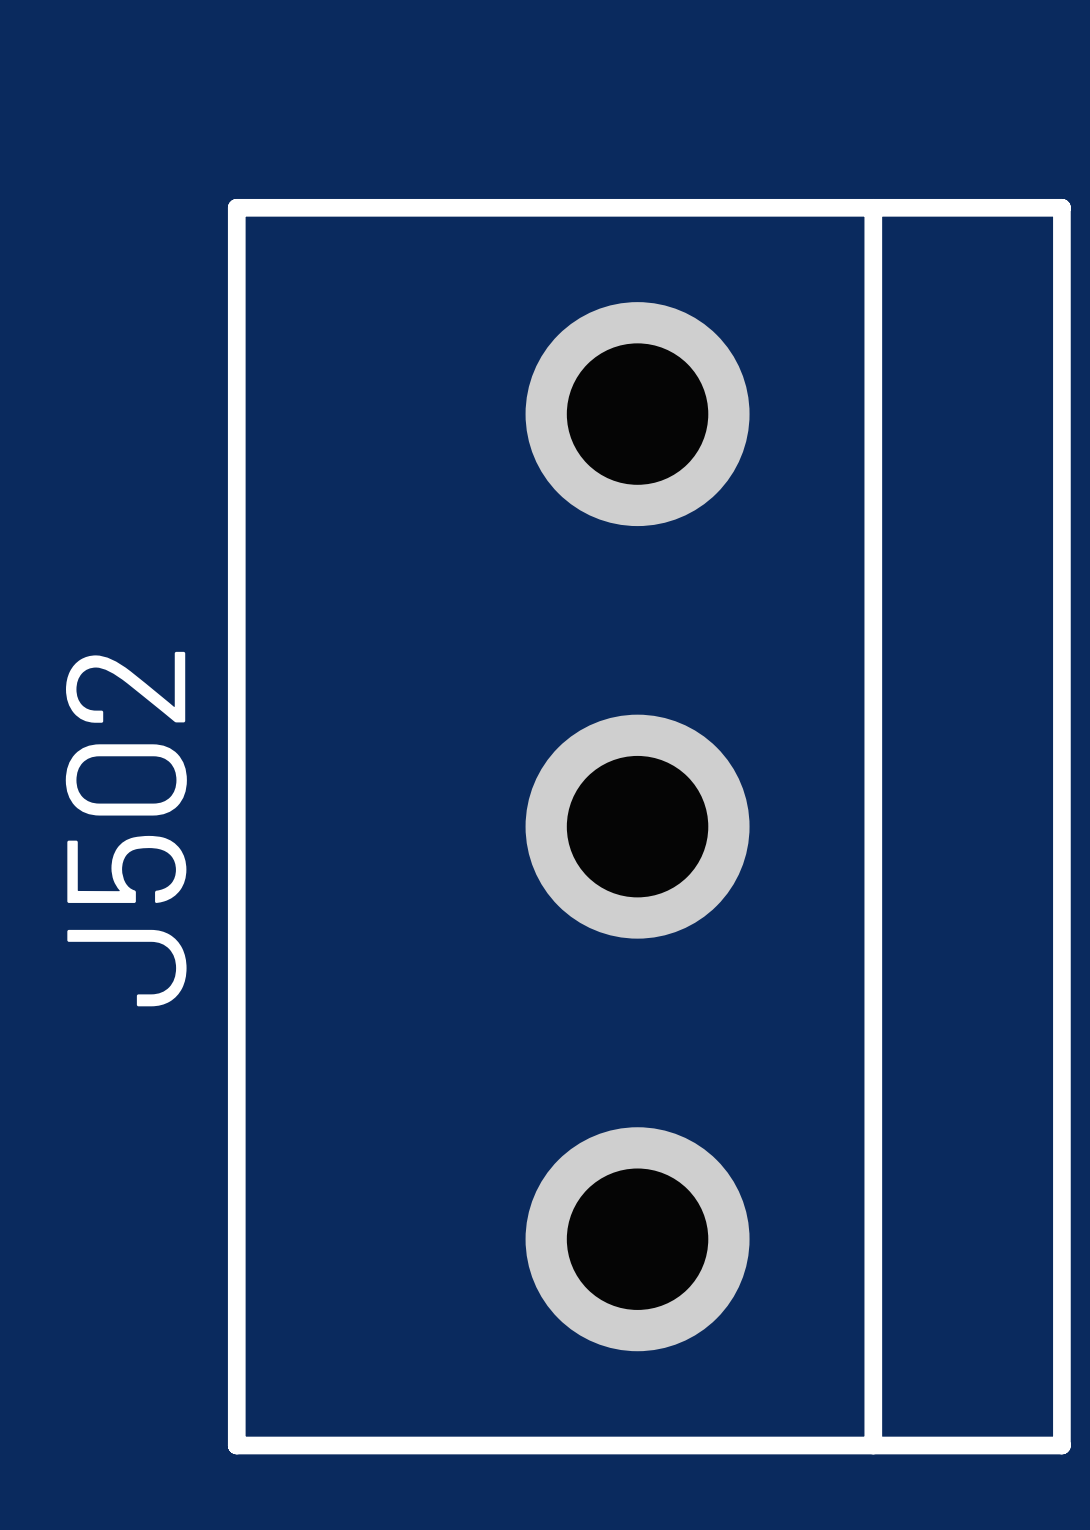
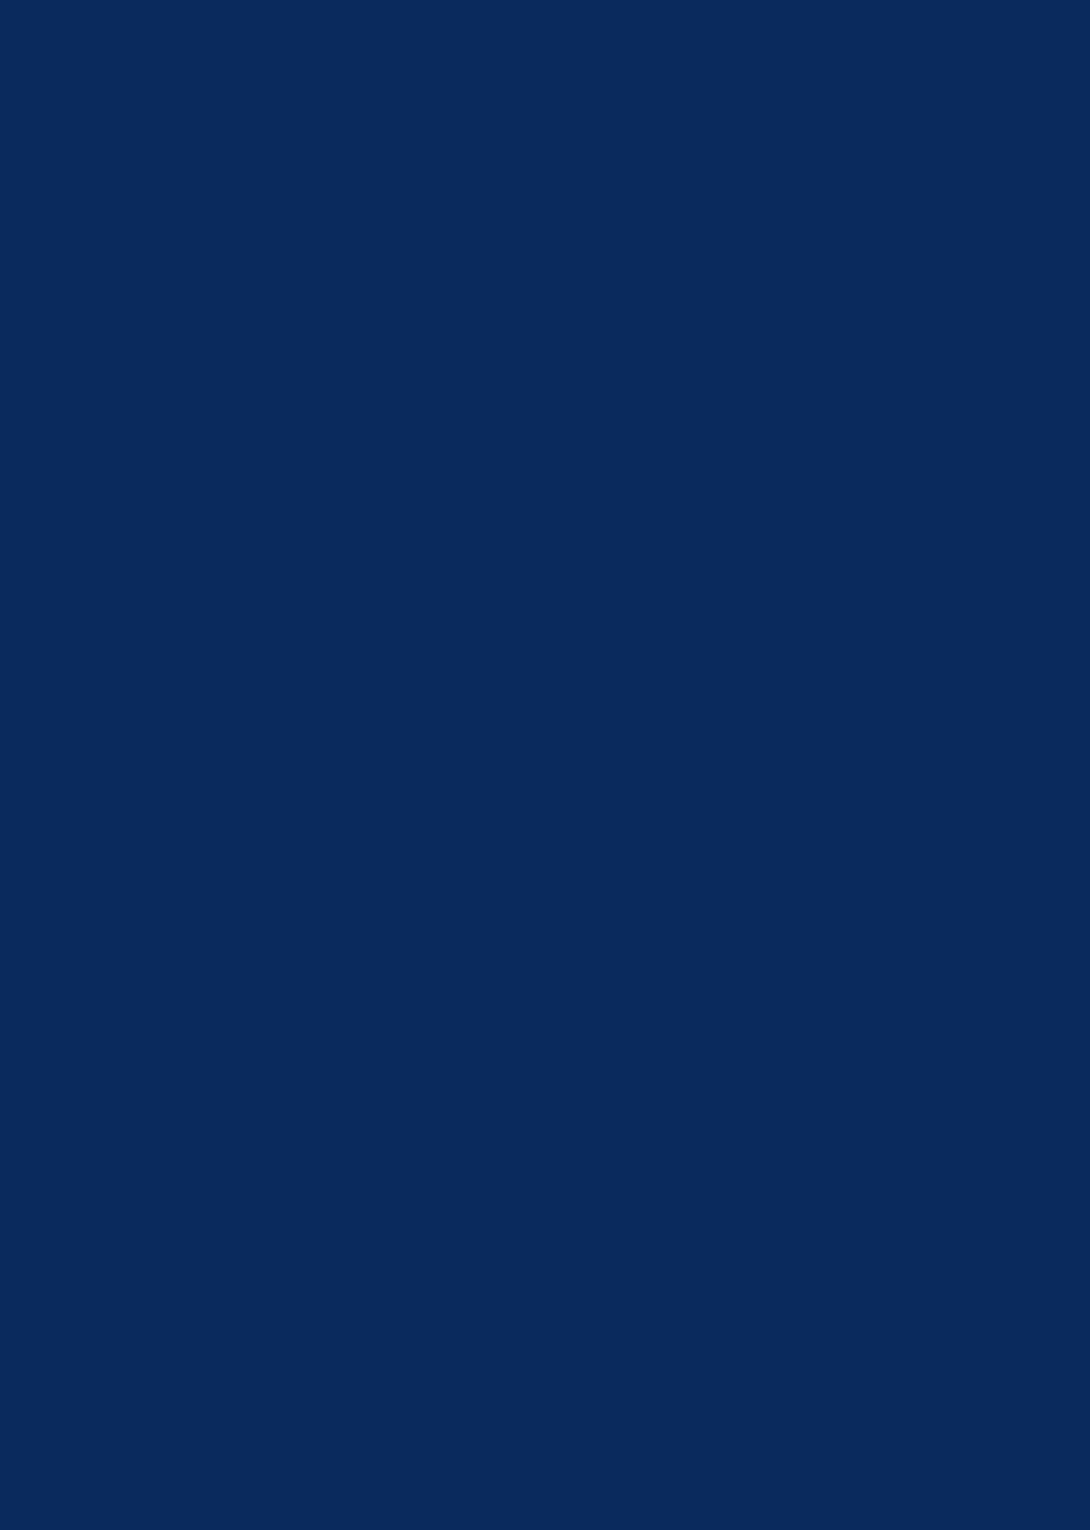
J502: (649, 826) -> none

